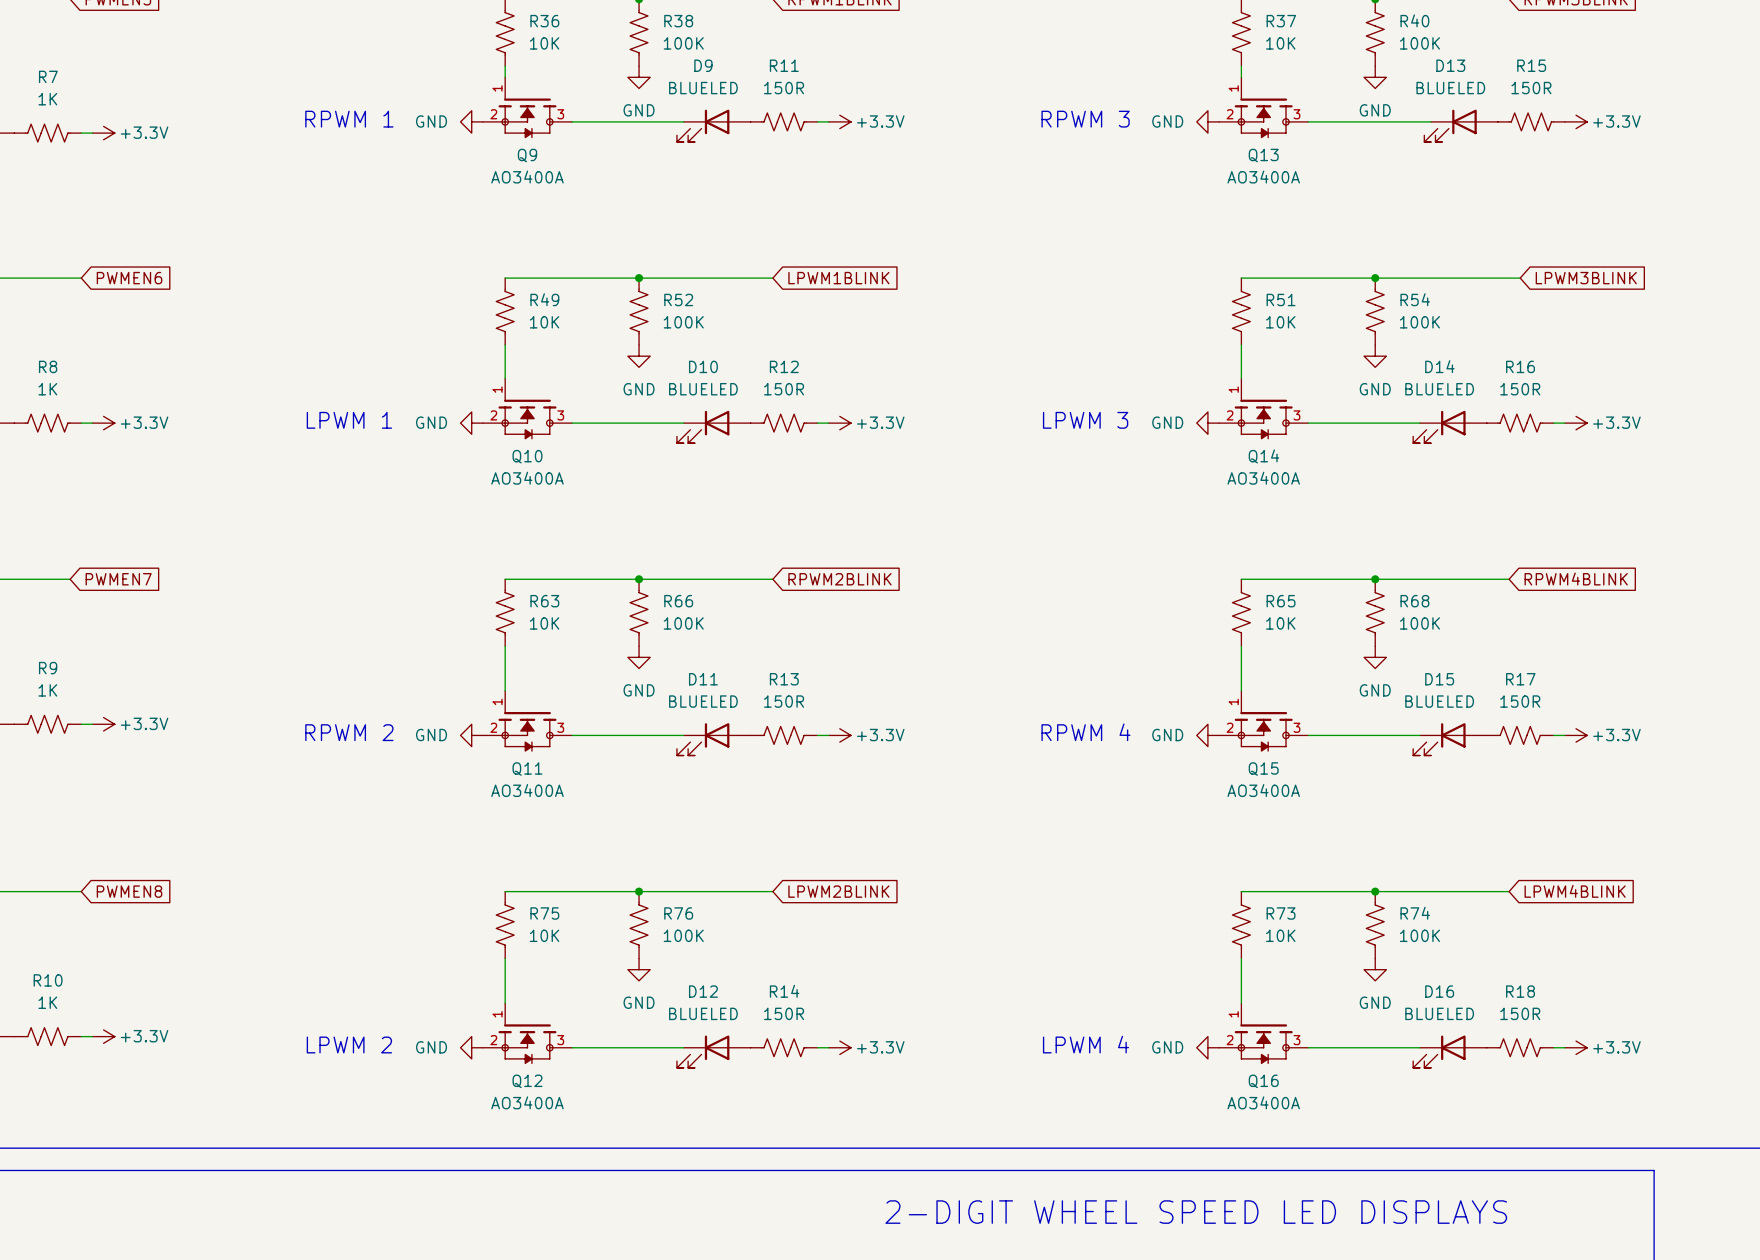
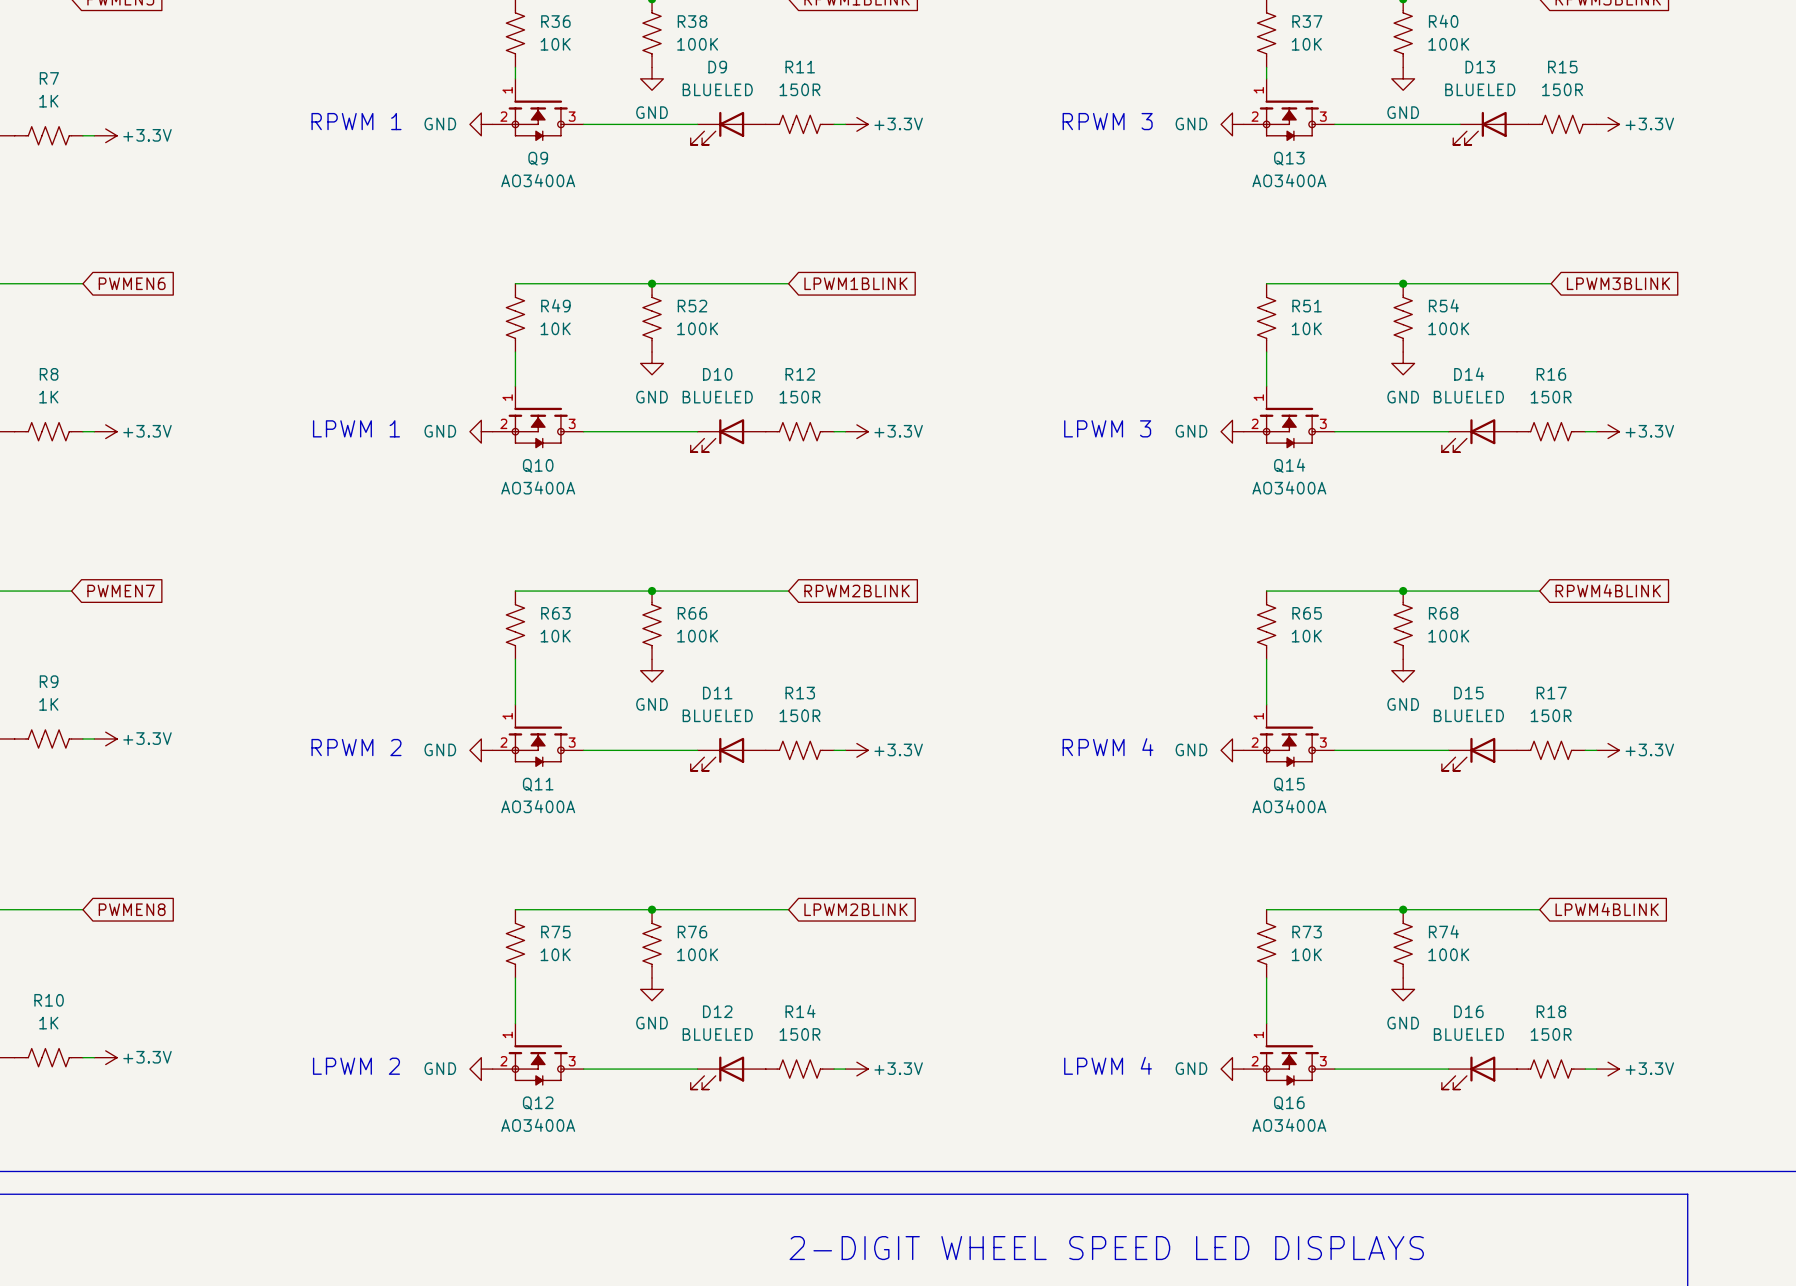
text position: 2-DIGIT WHEEL SPEED LED DISPLAYS (1196, 1212) -> 2-DIGIT WHEEL SPEED LED DISPLAYS (1106, 1248)

